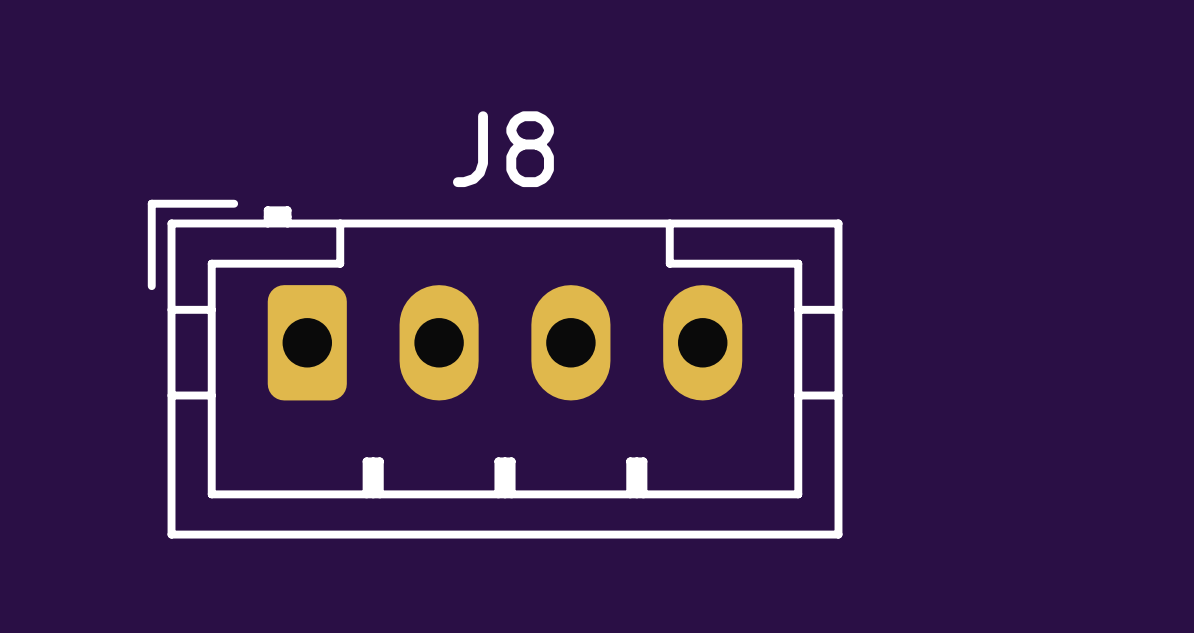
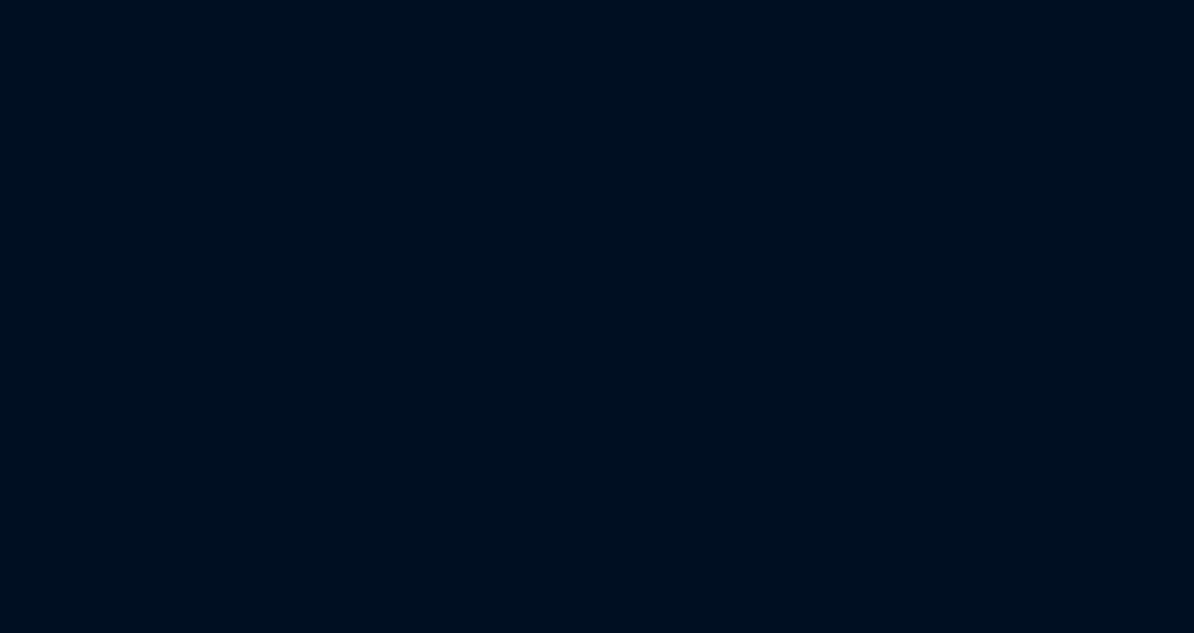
J8: (495, 369) -> none

